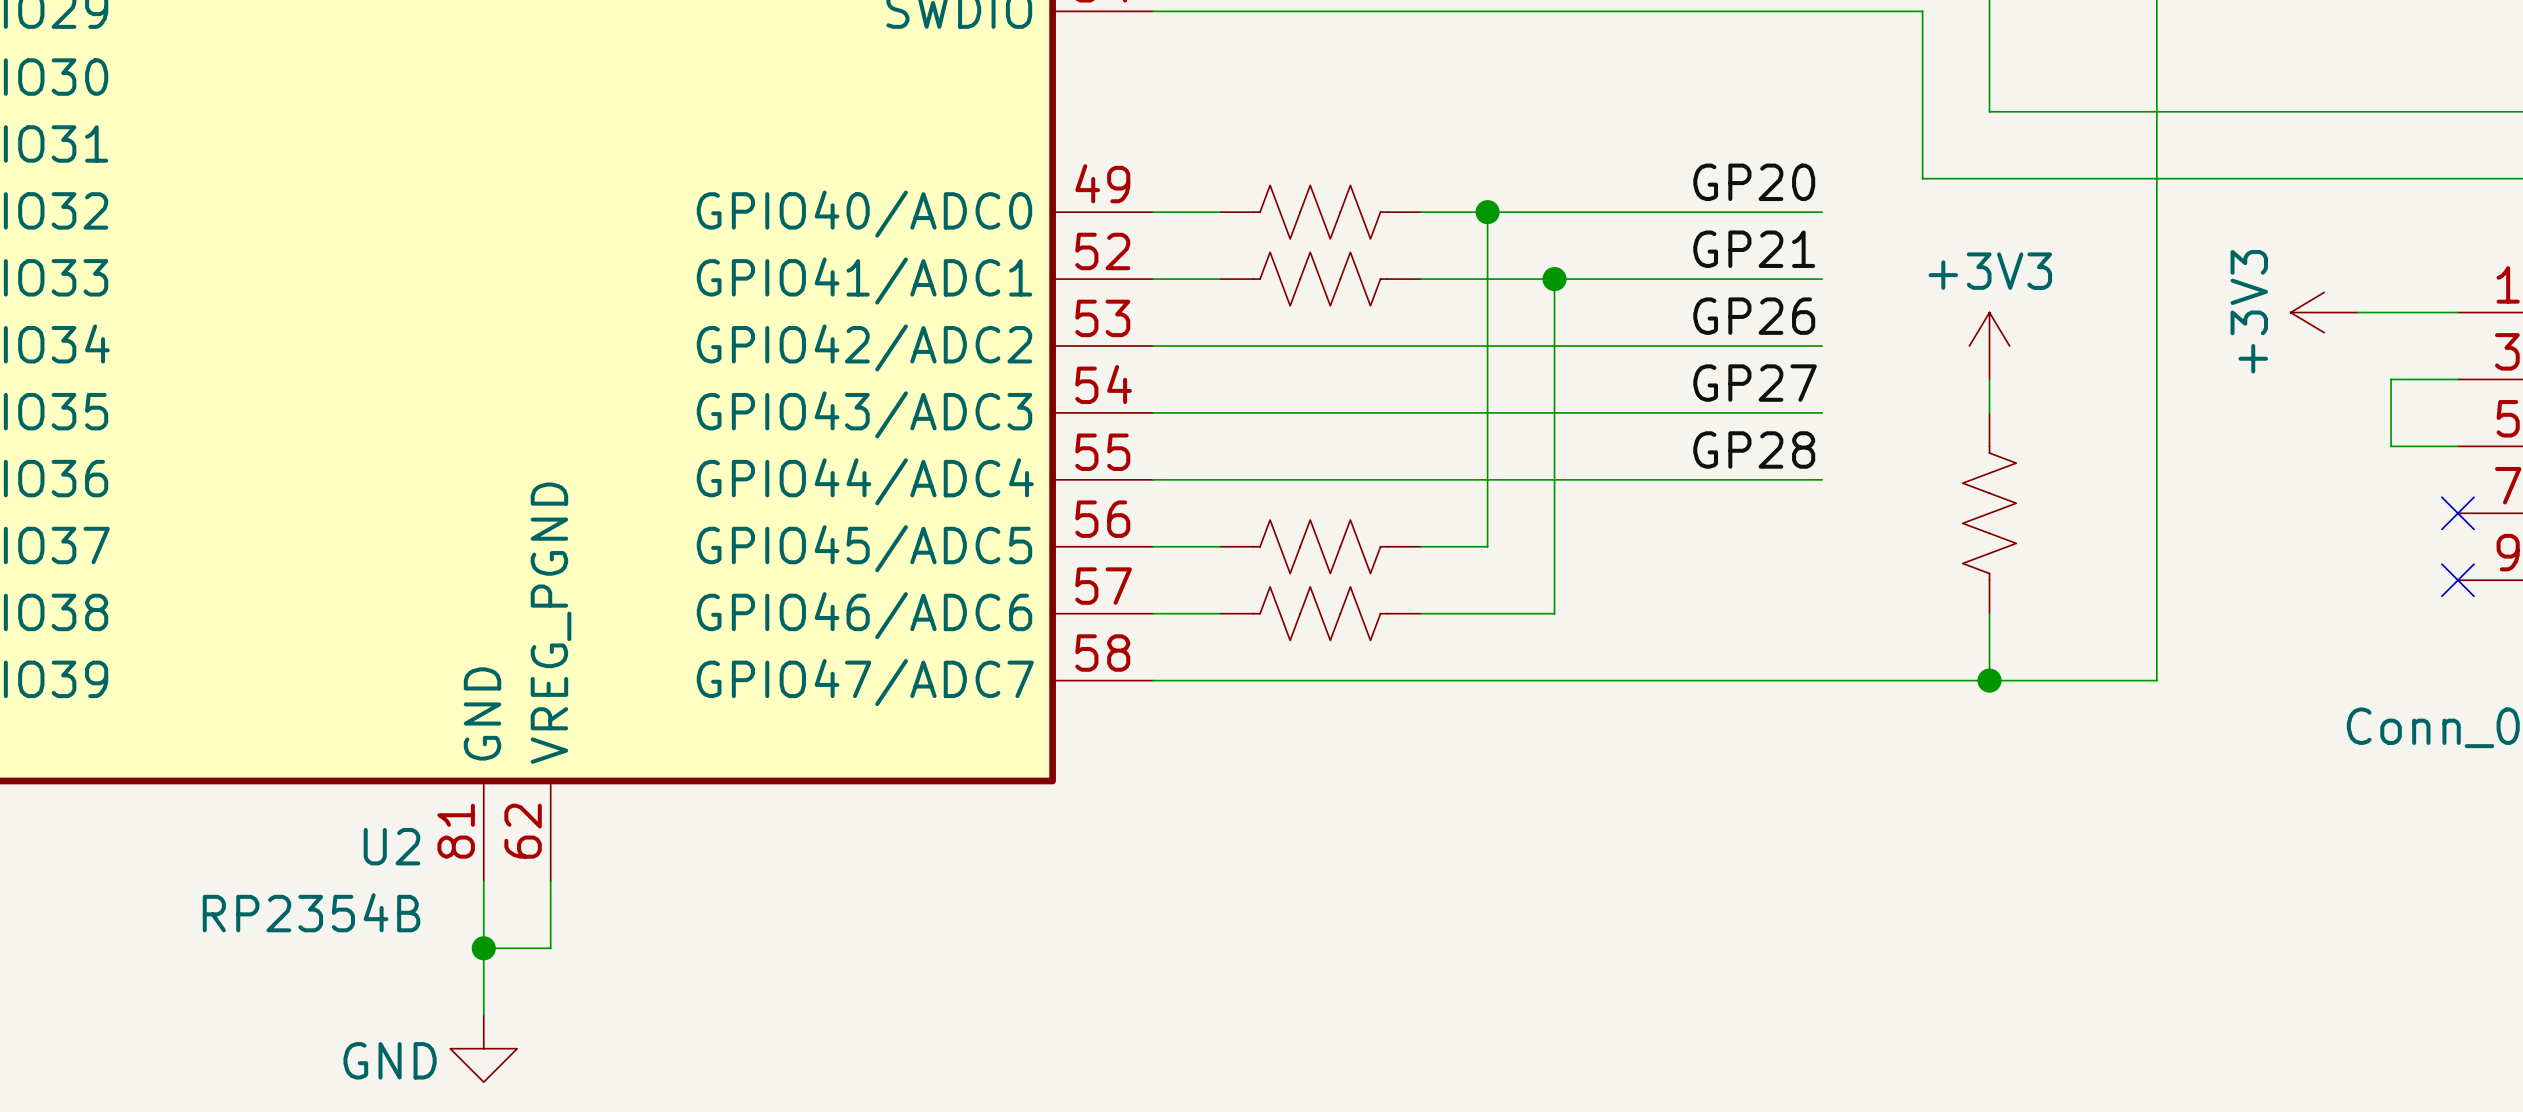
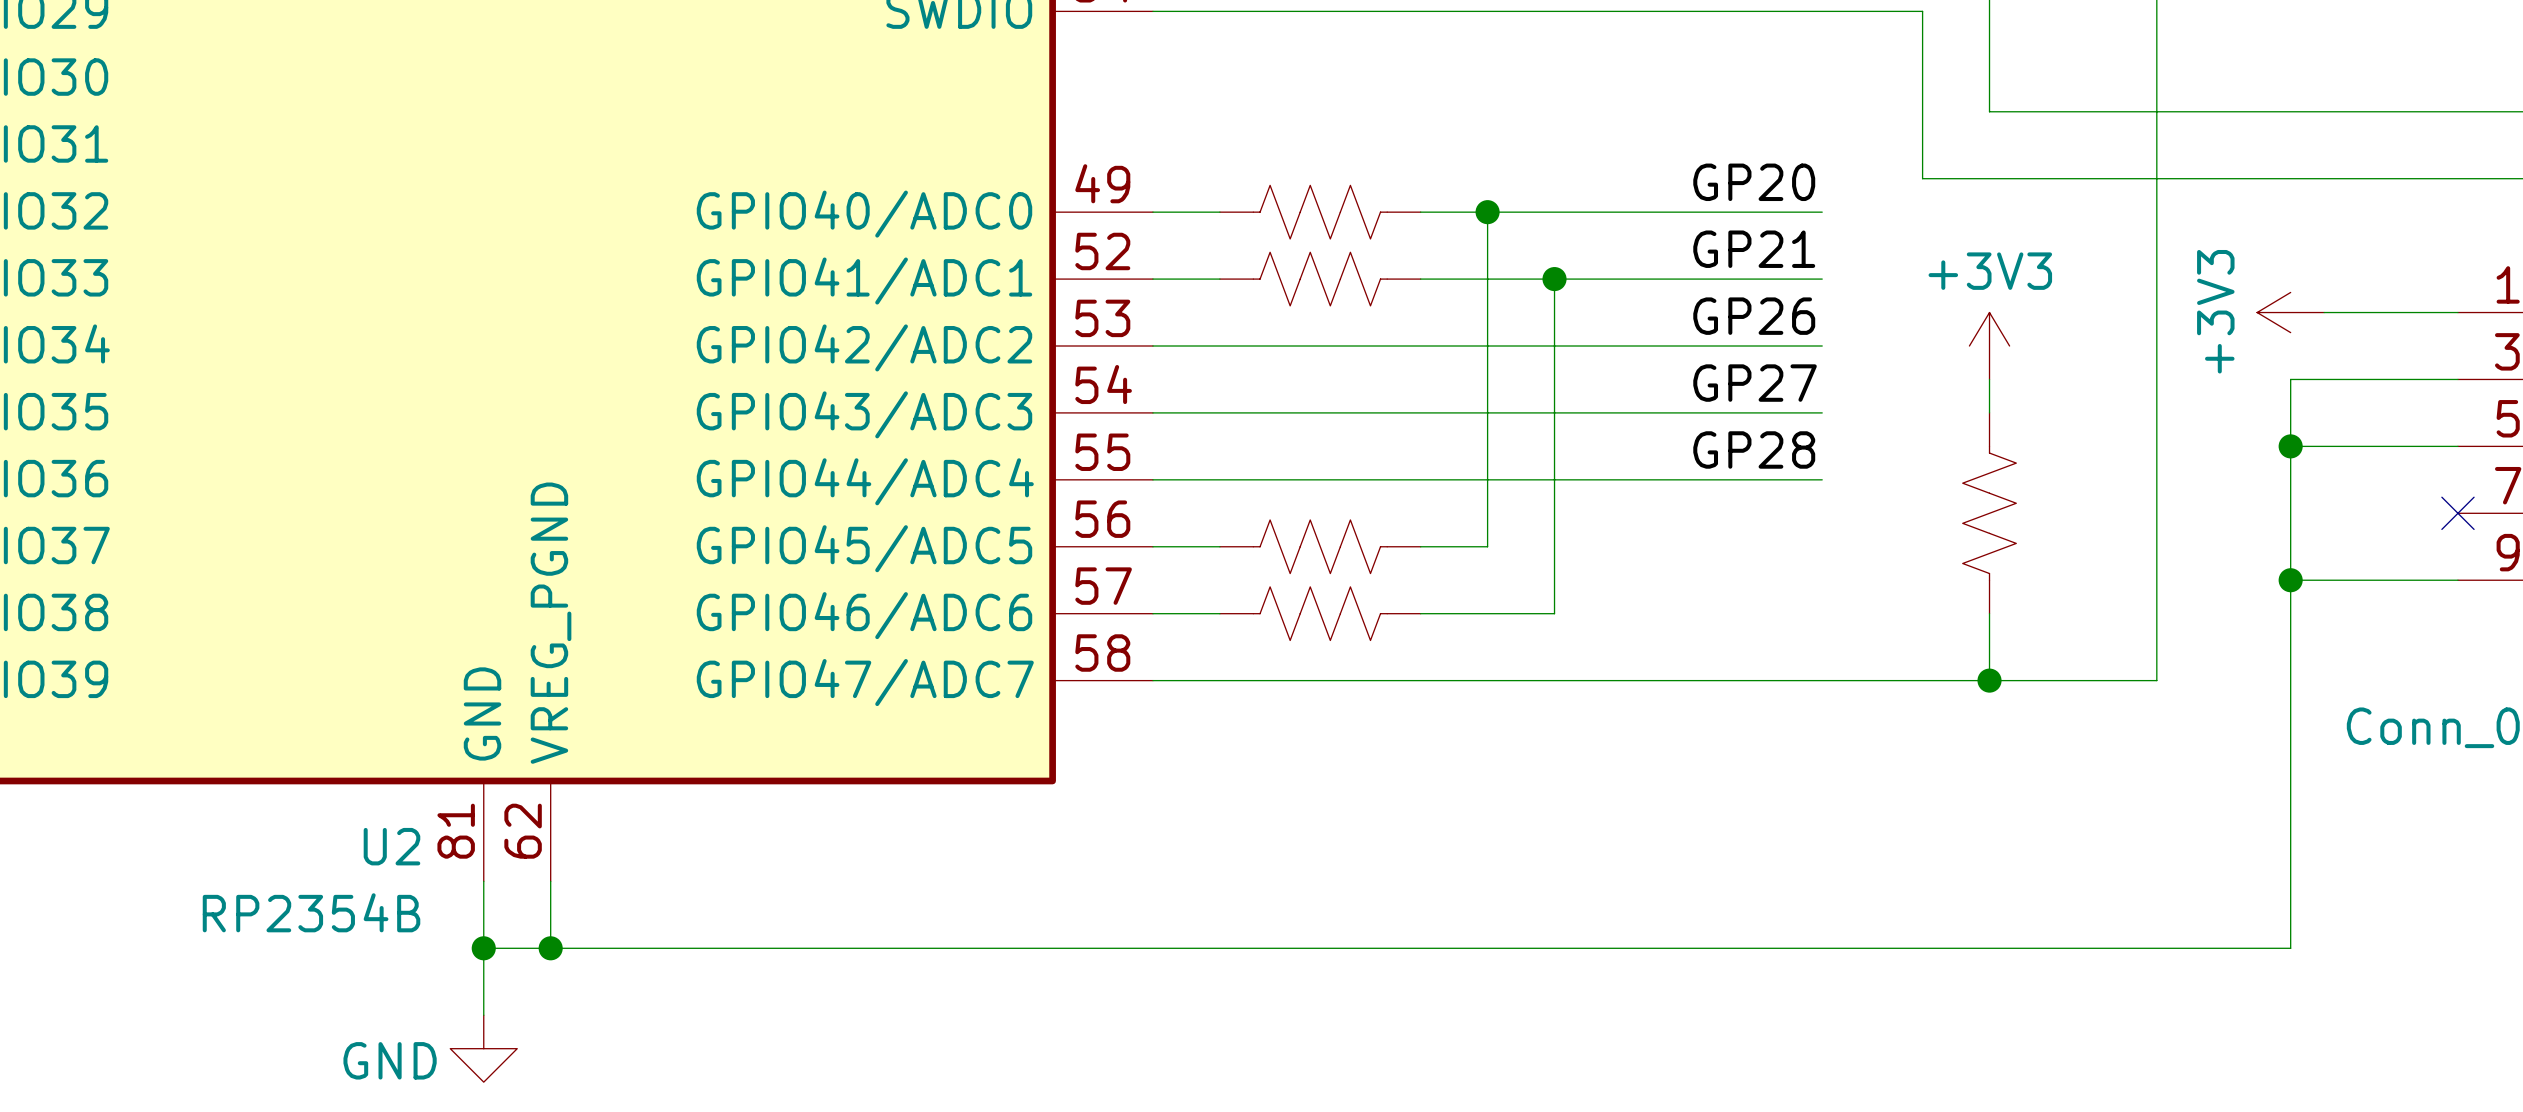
power symbol position: +3V3 (2324, 312) -> +3V3 (2290, 312)
wire: (2391, 379) (2391, 446) -> (2290, 446) (2391, 446)
wire: none -> (2391, 379) (2290, 379) (2290, 948) (550, 948)
junction: none -> (2290, 446)
wire: none -> (2290, 580) (2457, 580)
junction: none -> (2290, 580)
no-connect mark: (2457, 580) -> none
junction: none -> (550, 948)

